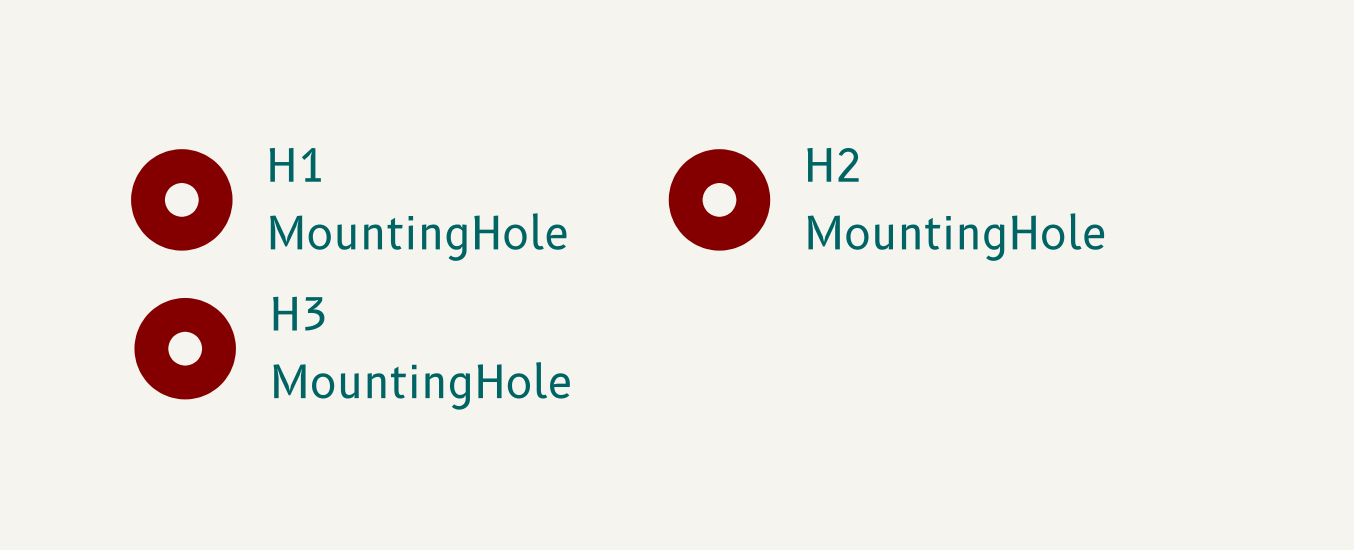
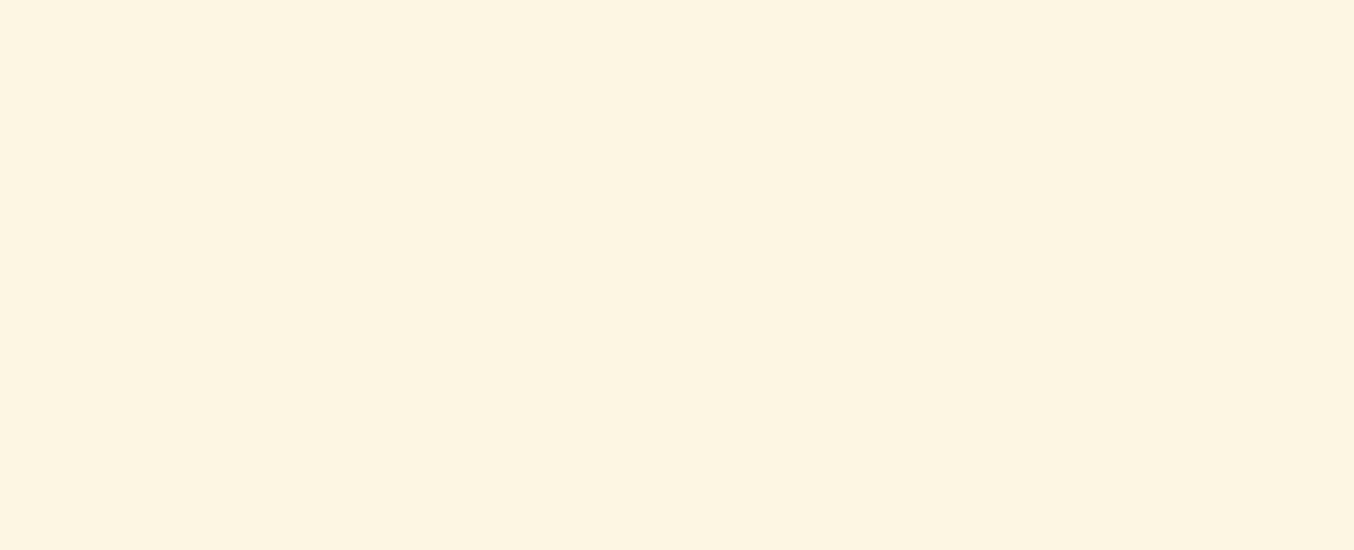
H1: MountingHole (181, 199) -> none
H2: MountingHole (719, 199) -> none
H3: MountingHole (185, 348) -> none

